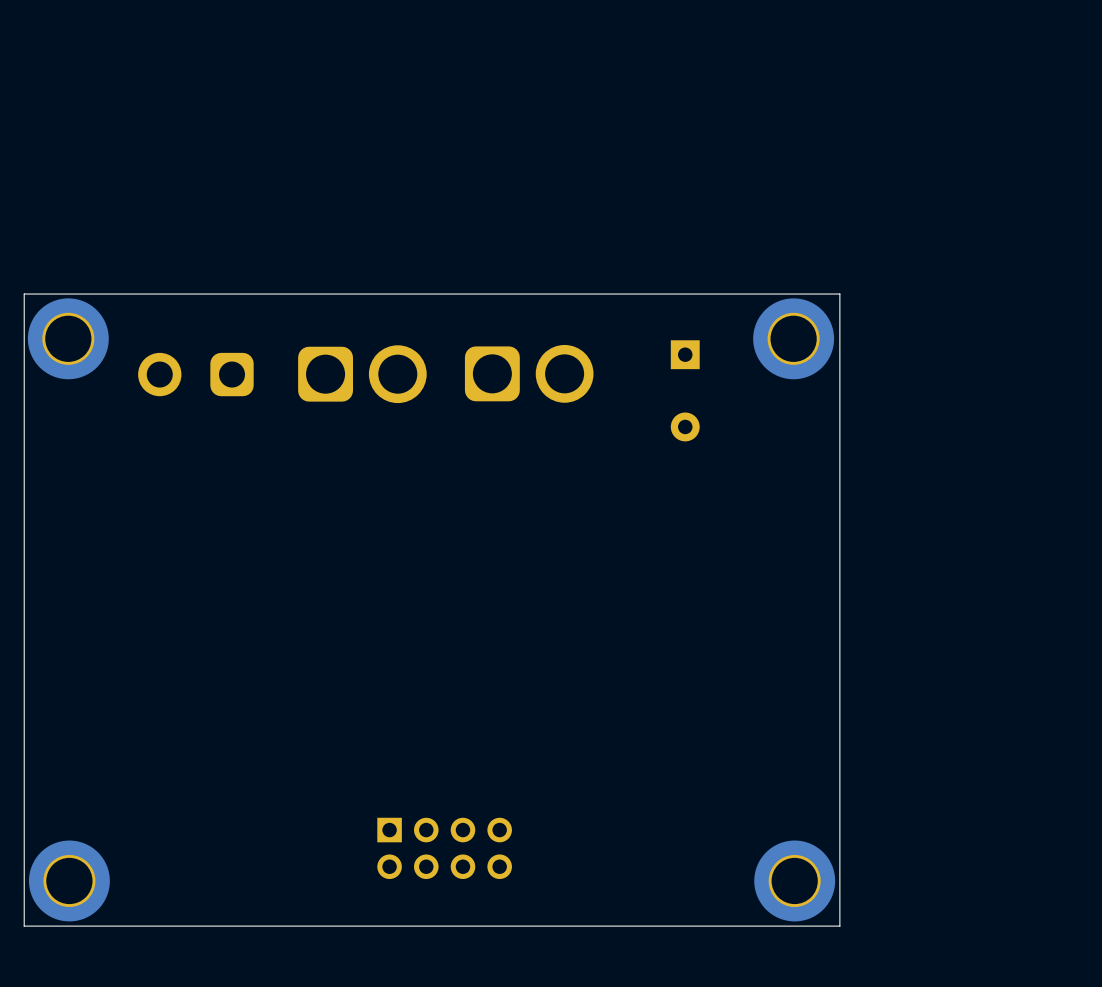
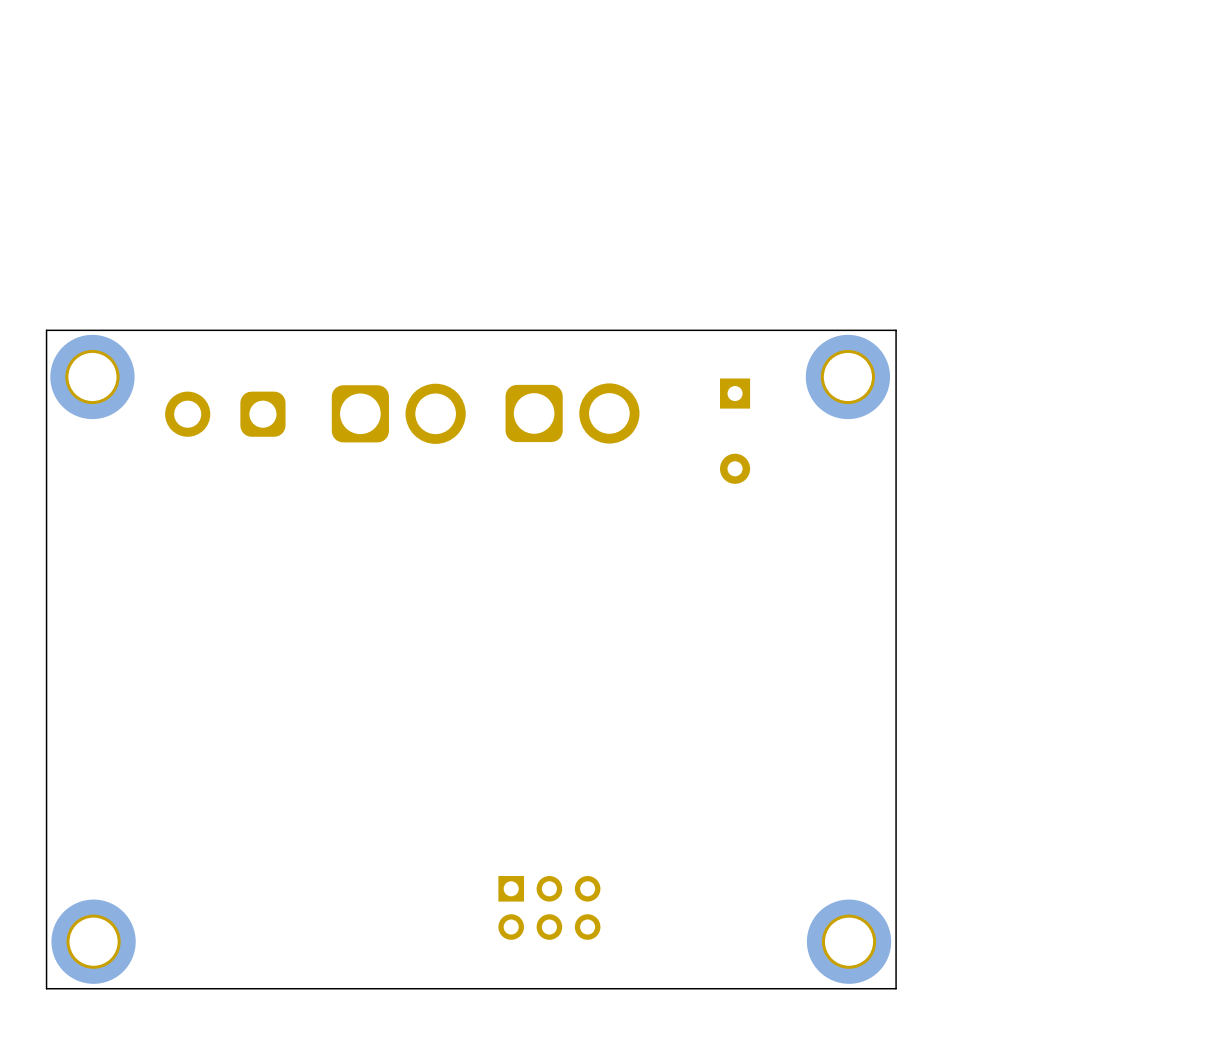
part: (444, 848) -> none
part: none -> (549, 907)

